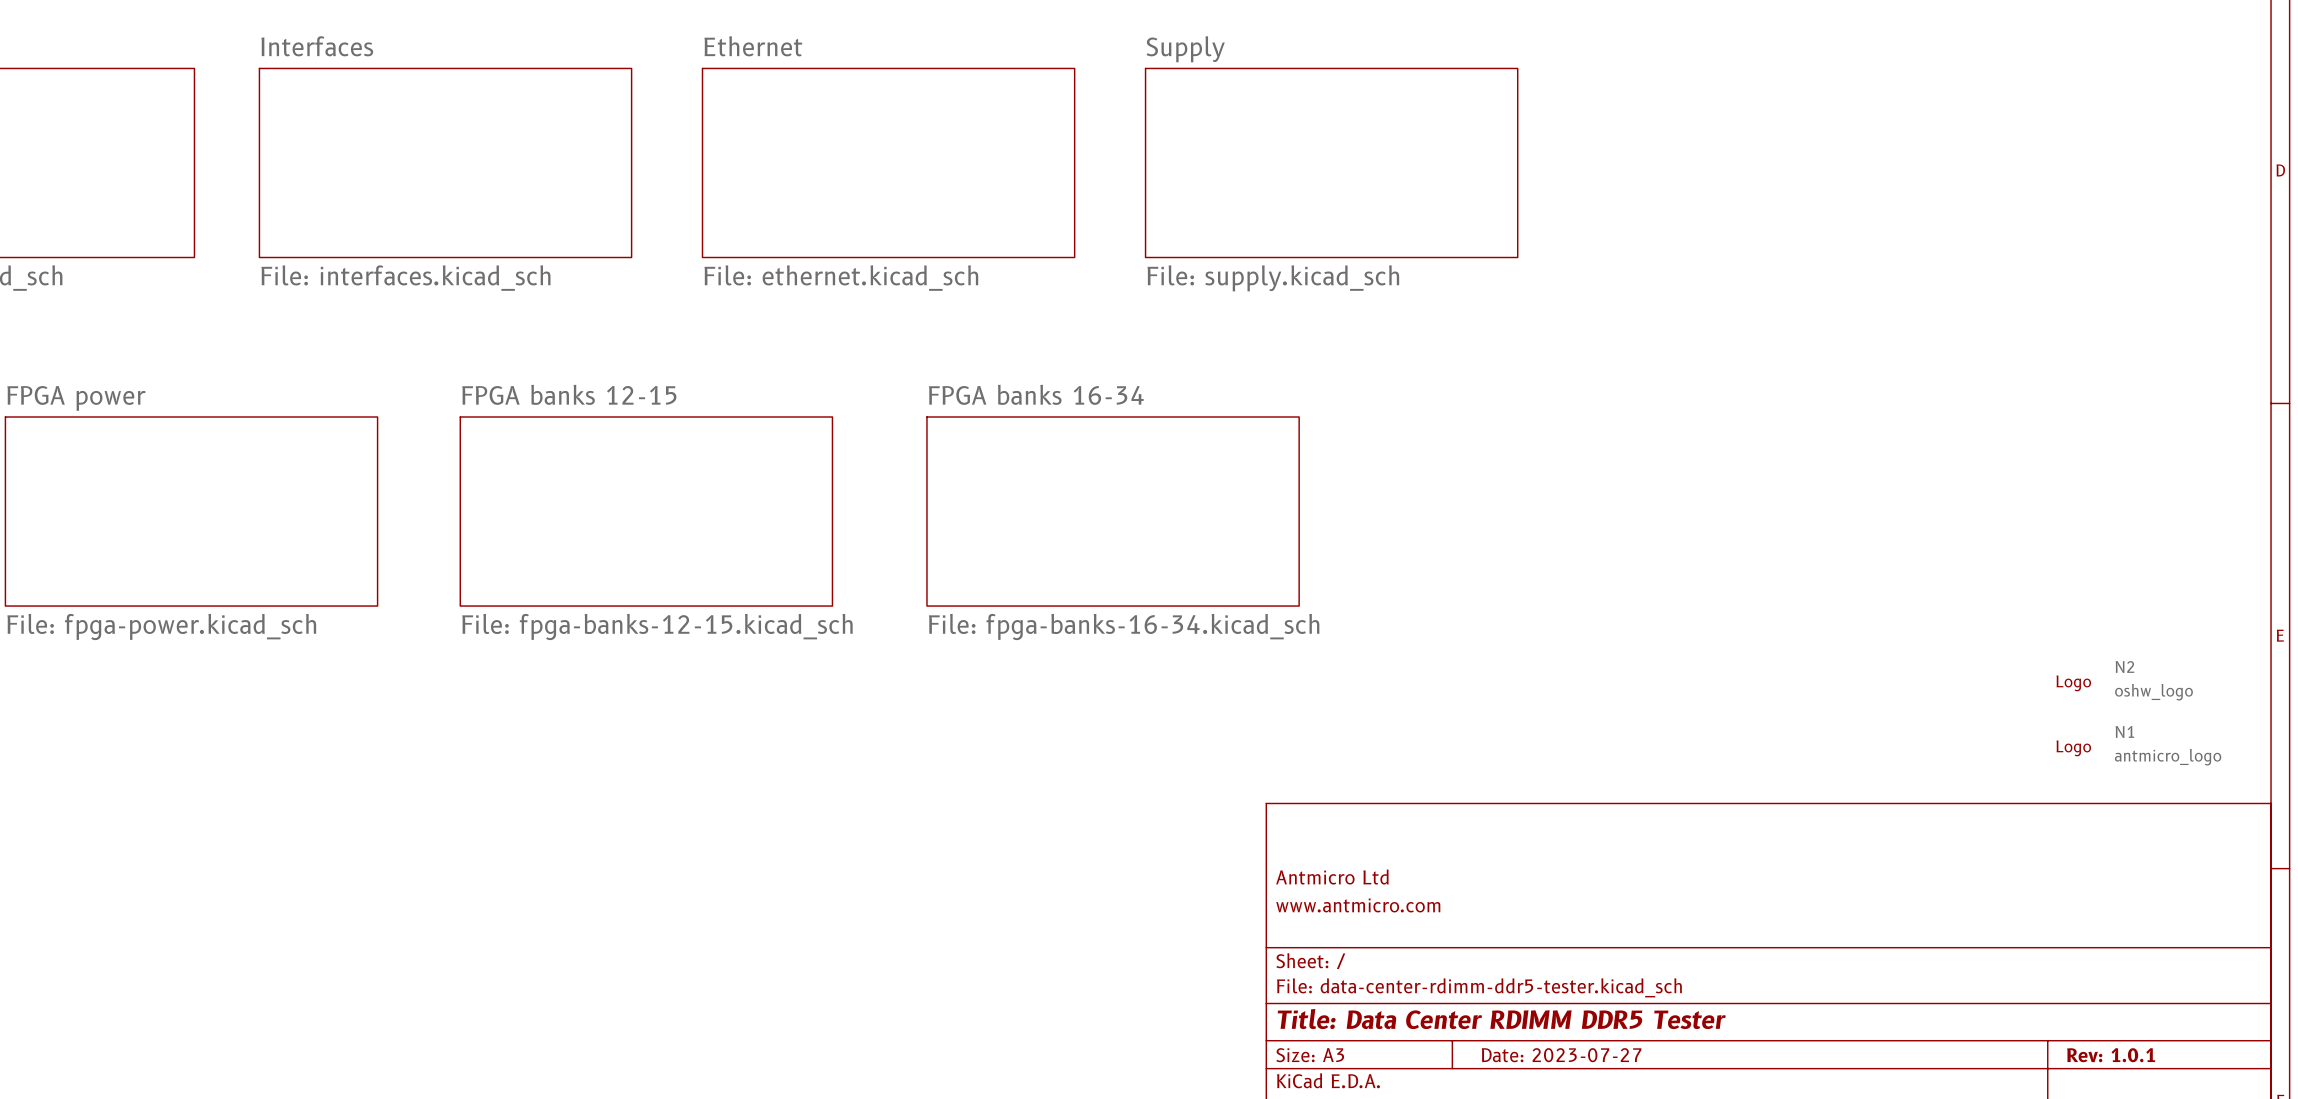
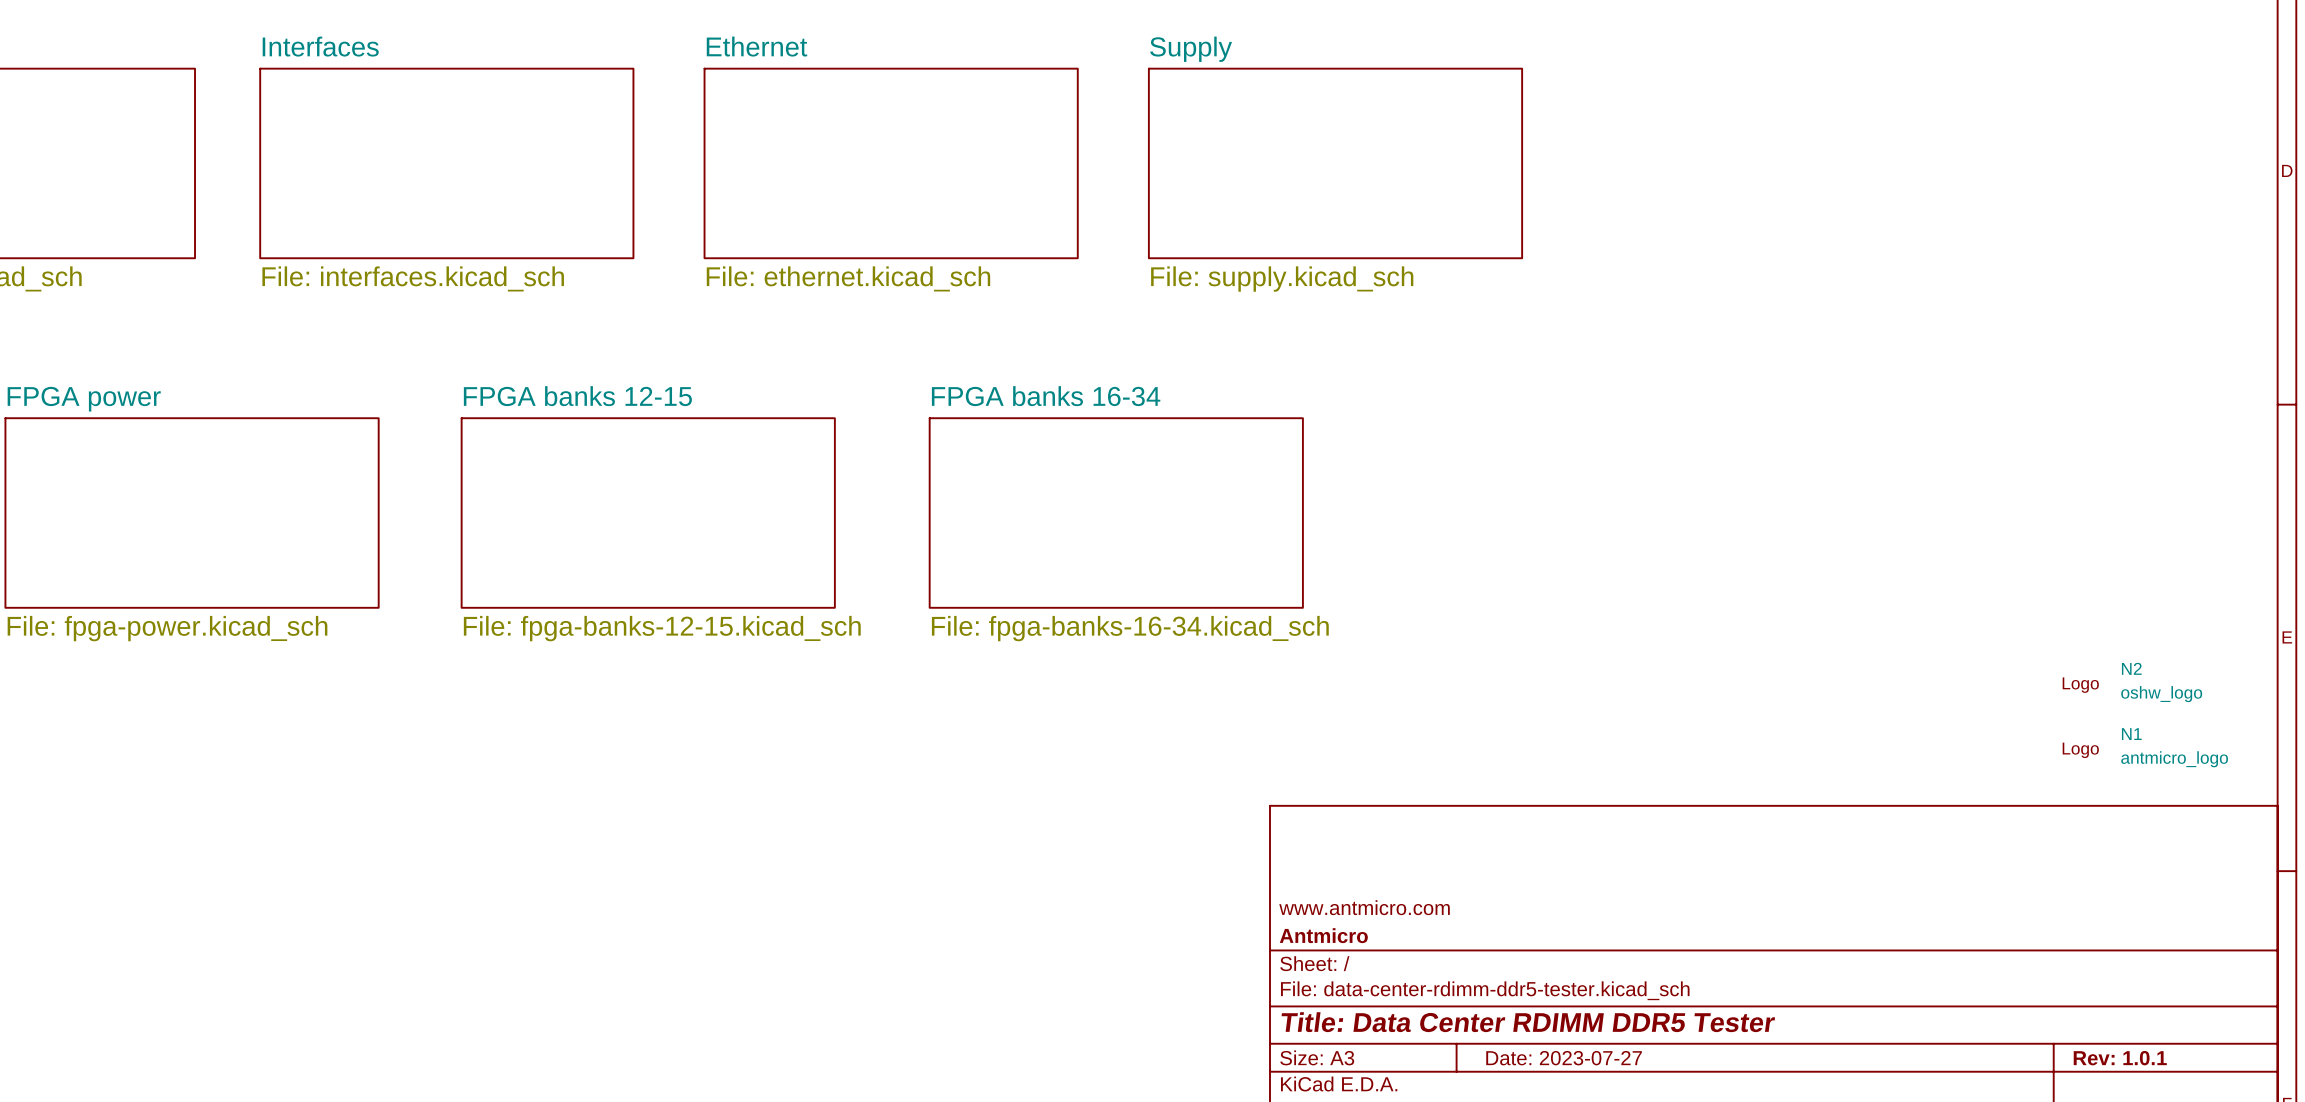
title block: Antmicro Ltd (1332, 877) -> none
title block: none -> Antmicro (1323, 935)

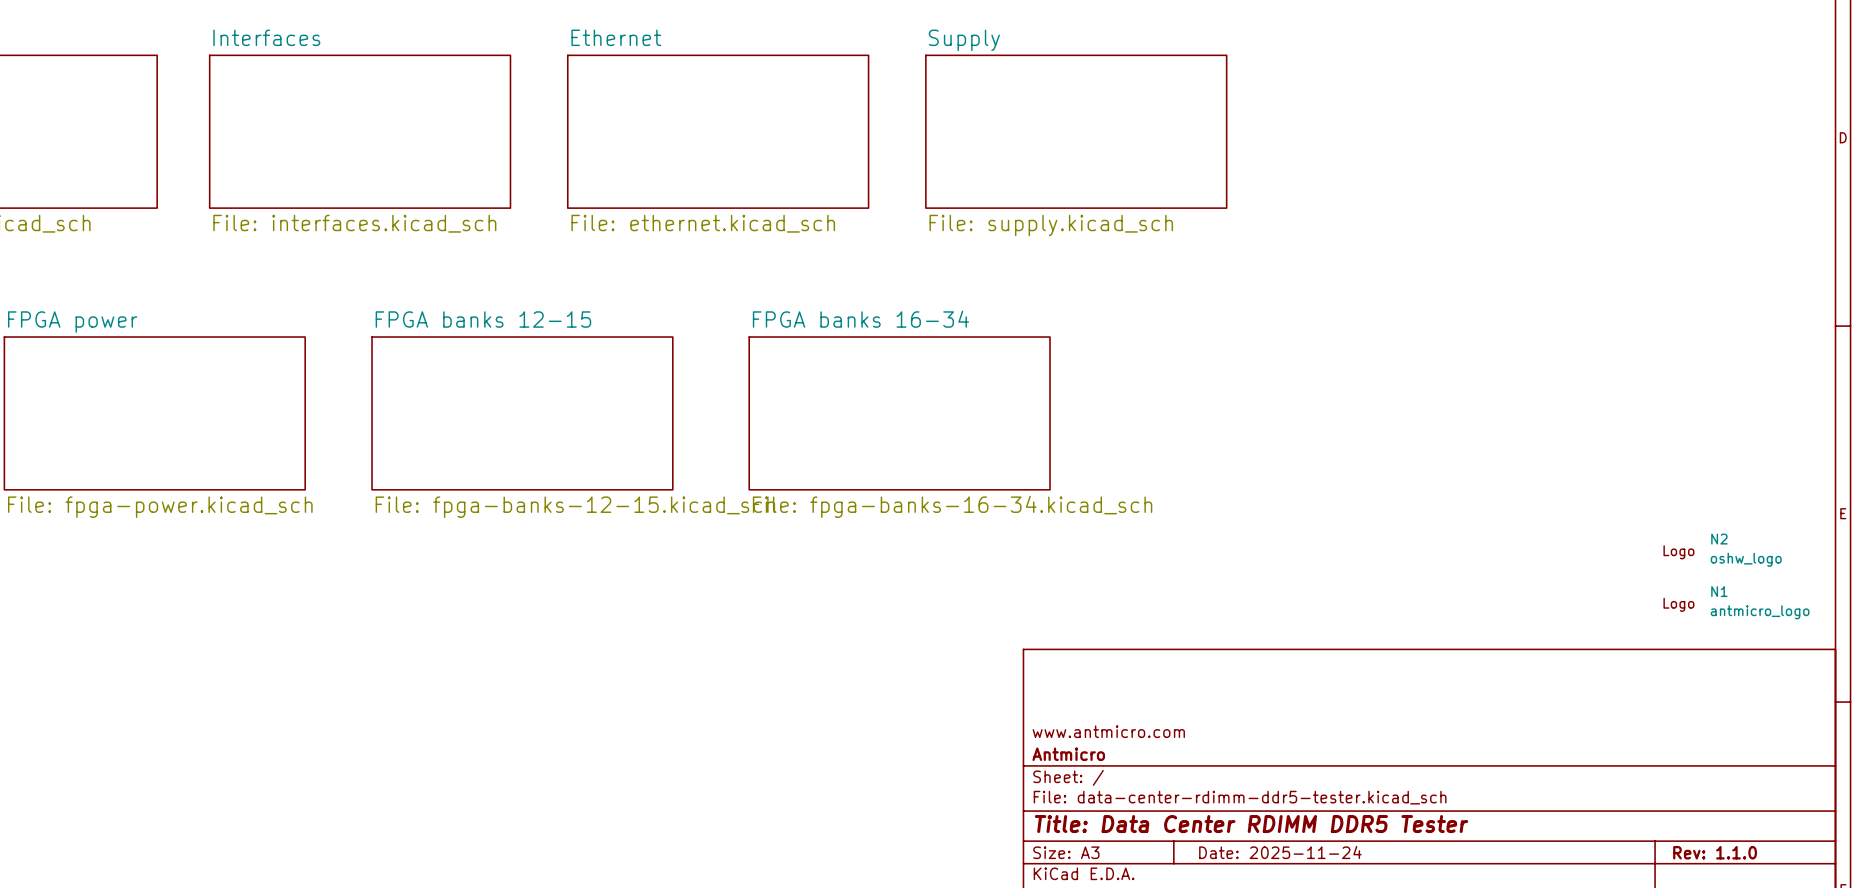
title block: Date: 2023-07-27 (1564, 1058) -> Date: 2025-11-24 (1280, 852)
title block: Rev: 1.0.1 (2120, 1058) -> Rev: 1.1.0 (1715, 852)

